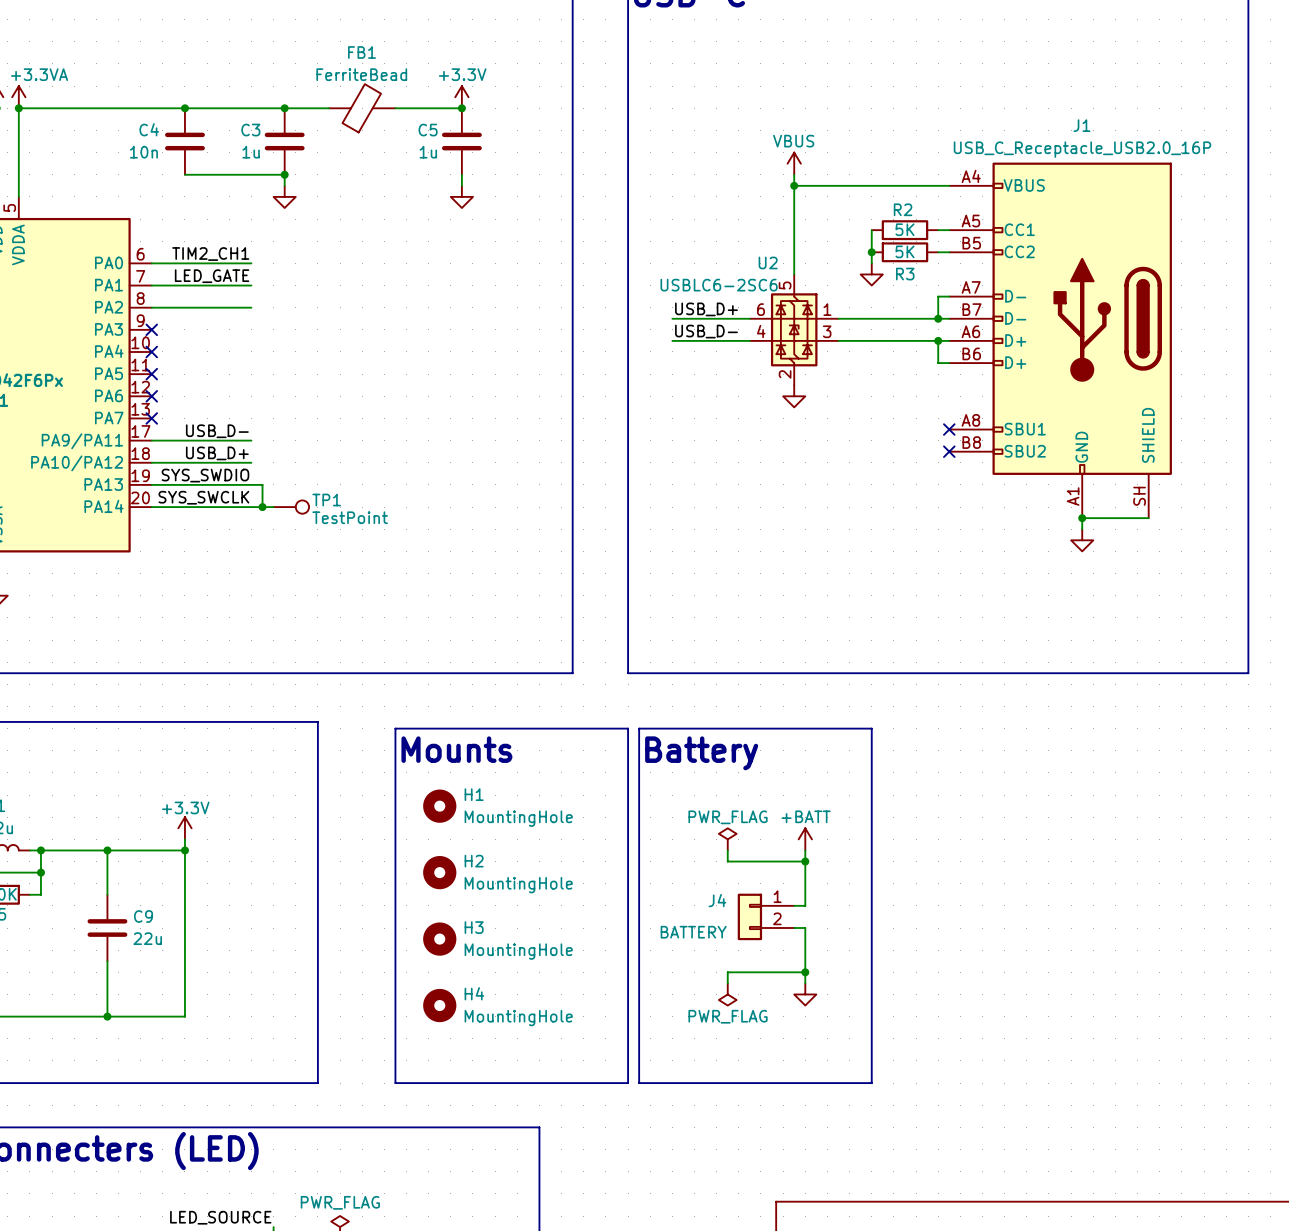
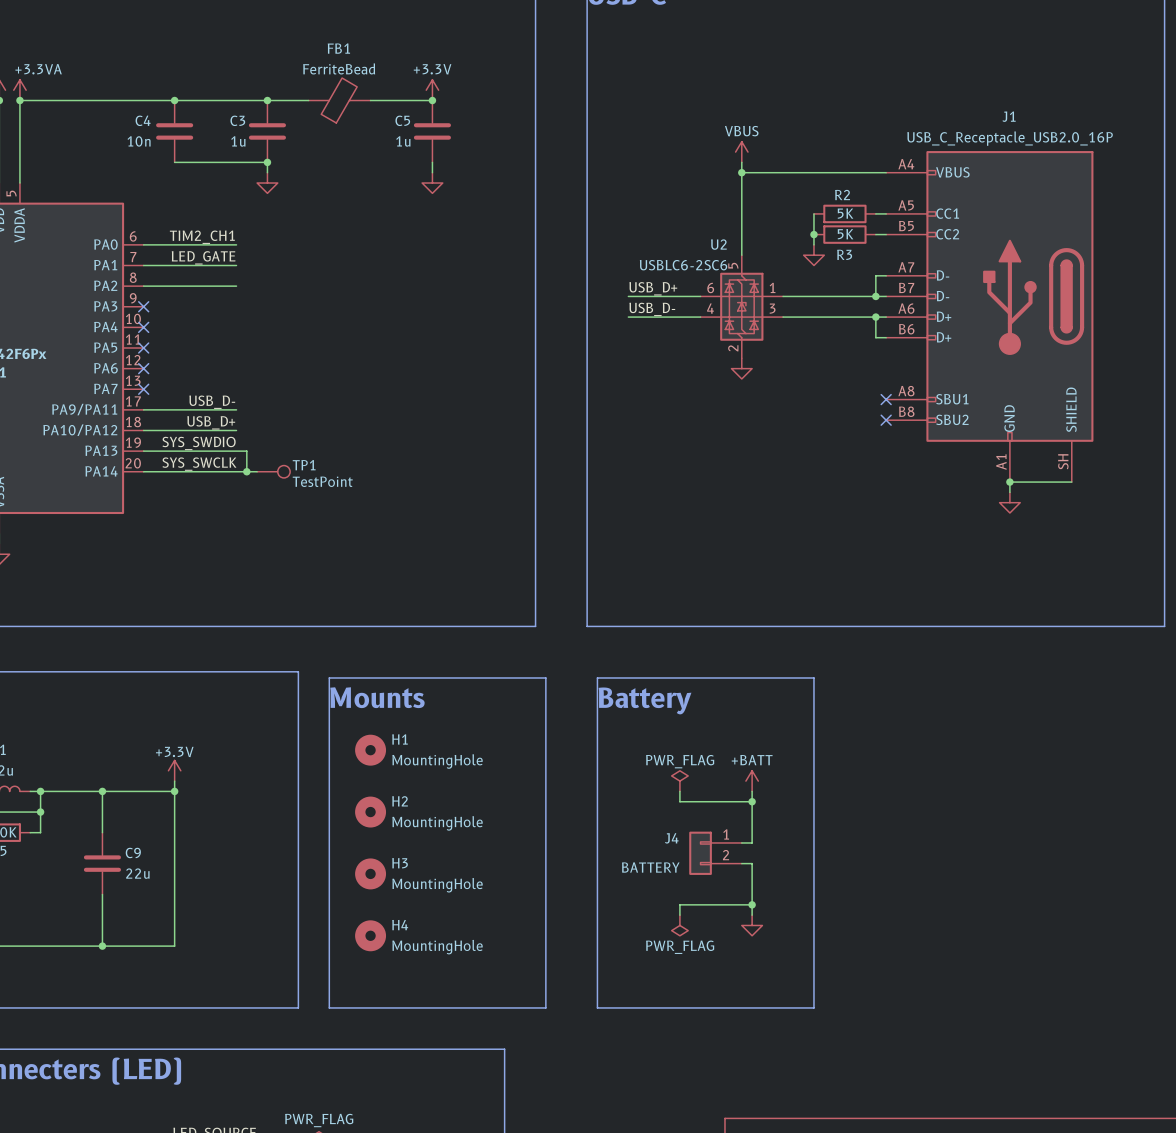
line: (395, 728) (395, 1083) -> (370, 677) (329, 677) (329, 1007) (370, 1007)
line: (583, 728) (628, 728) (628, 1083) (583, 1083) -> (545, 677) (545, 1007)
text position: Mounts (456, 749) -> Mounts (377, 697)
H1 position: (439, 806) -> (370, 750)
H2 position: (439, 872) -> (370, 812)
H3 position: (439, 939) -> (370, 873)
H4 position: (439, 1005) -> (370, 935)

